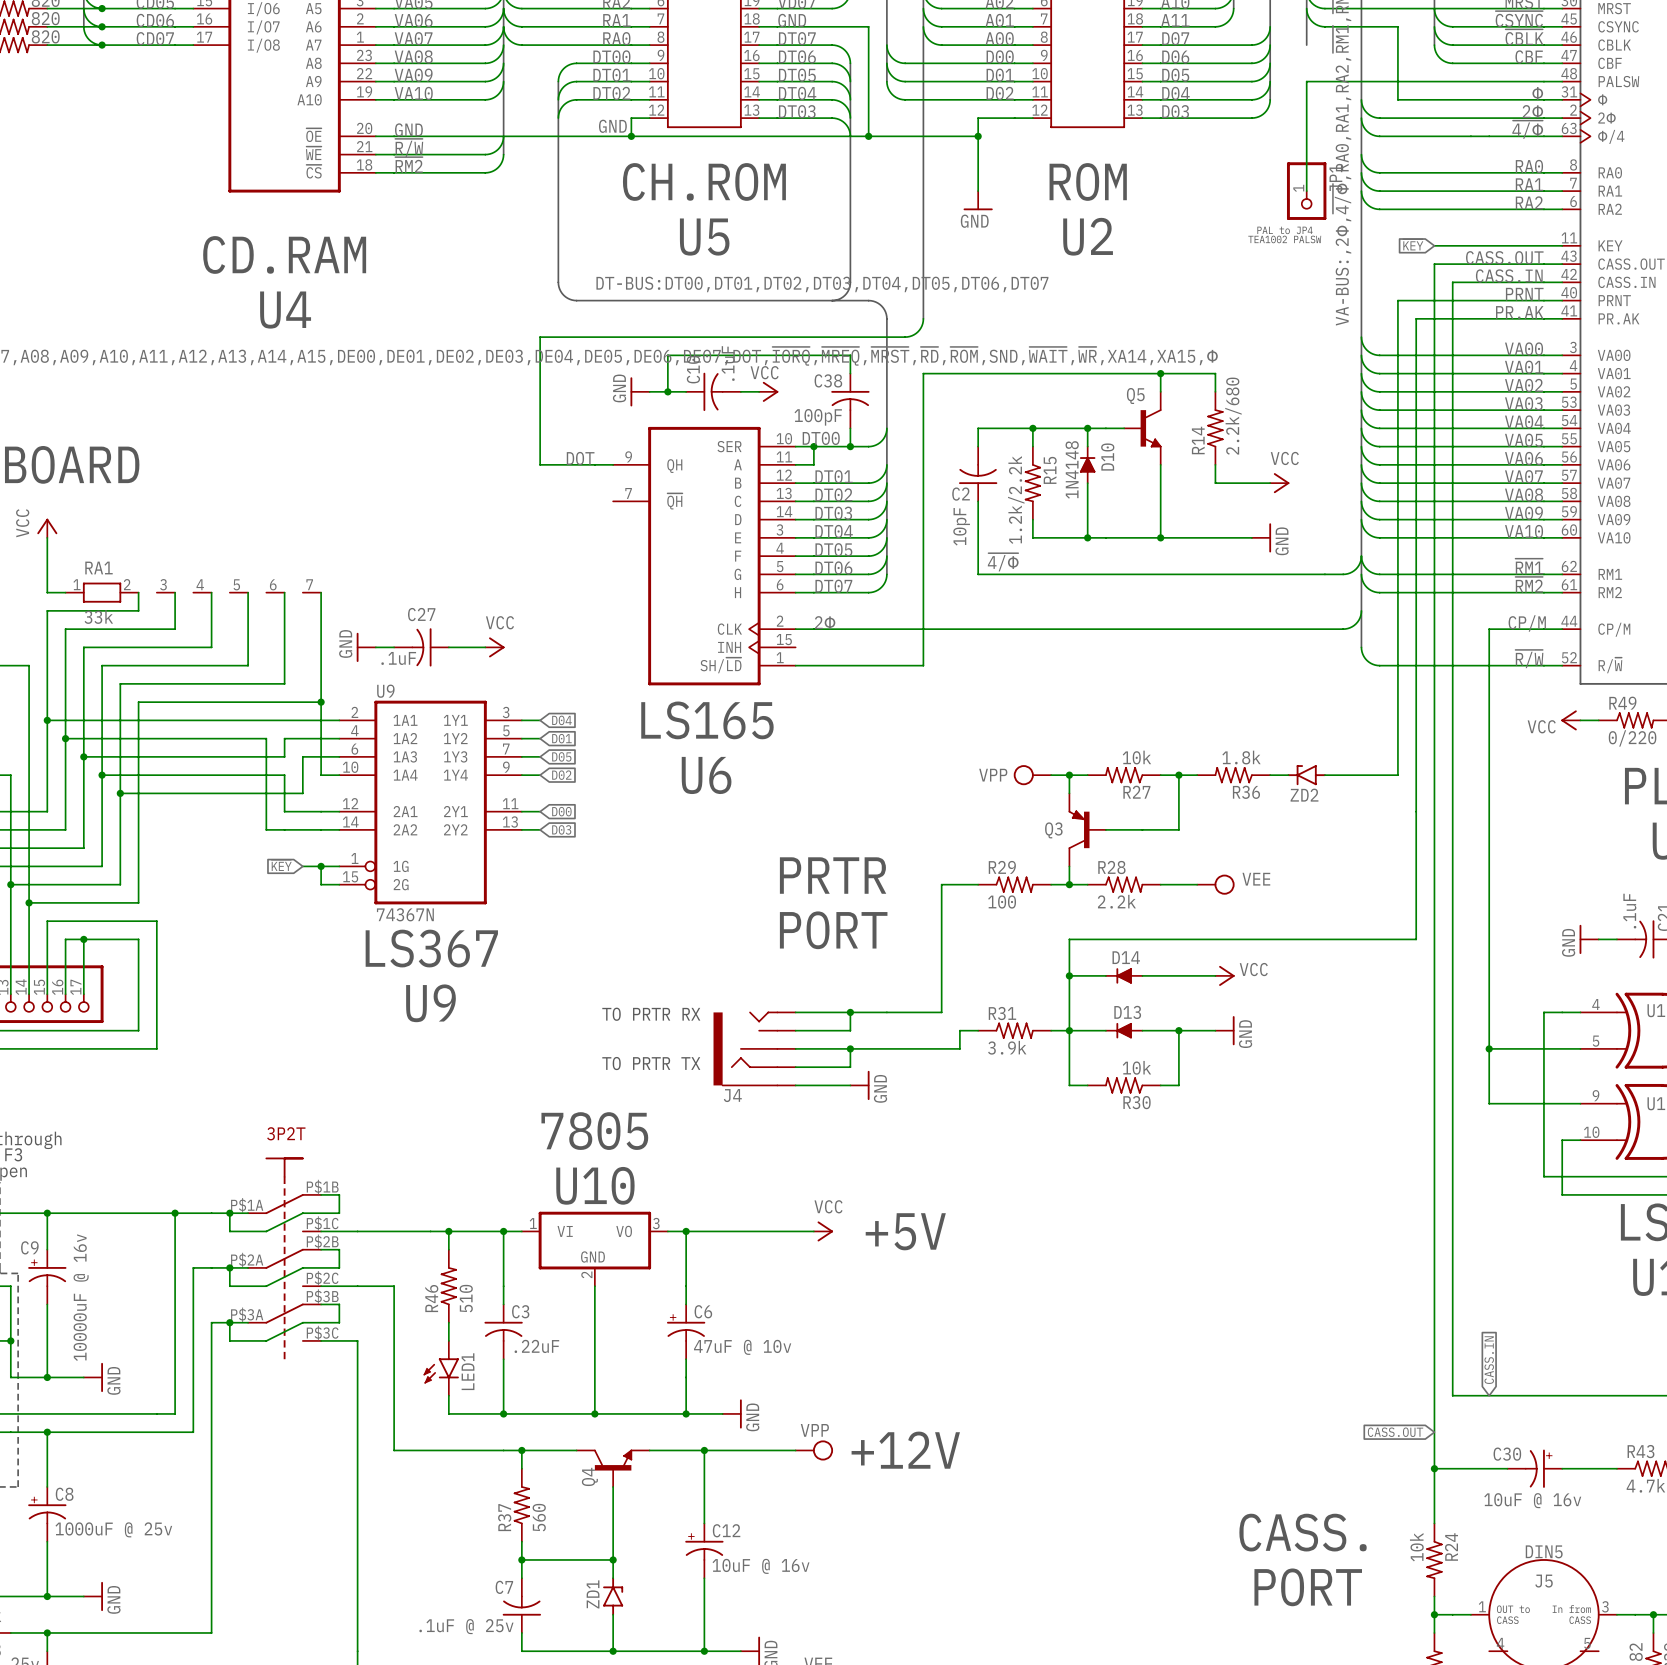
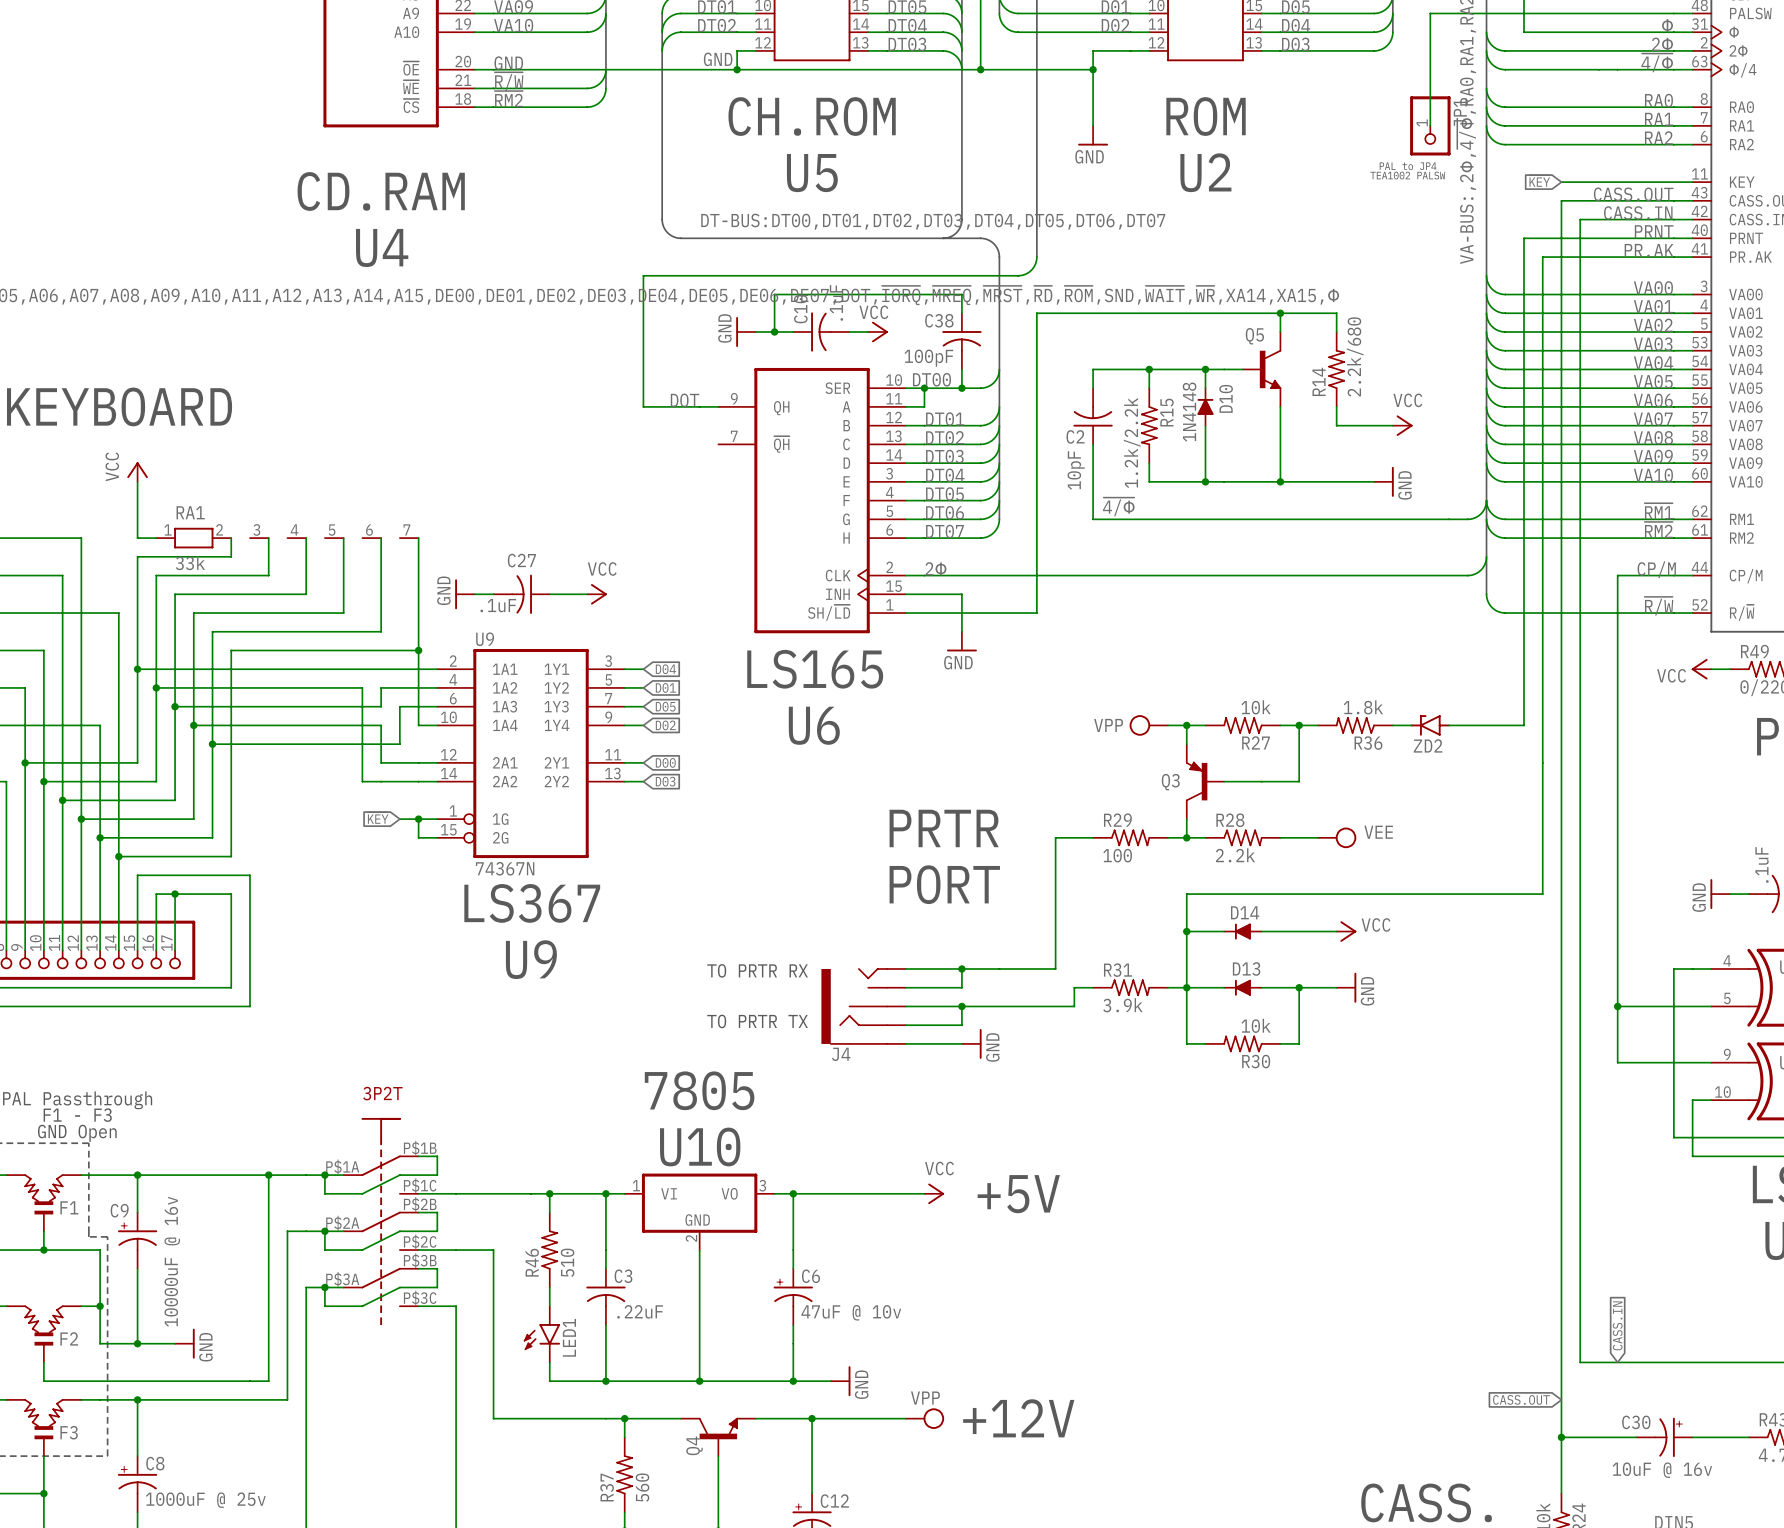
wire: none -> (905, 594) (961, 594) (961, 631)
power symbol: none -> GND (961, 641)

